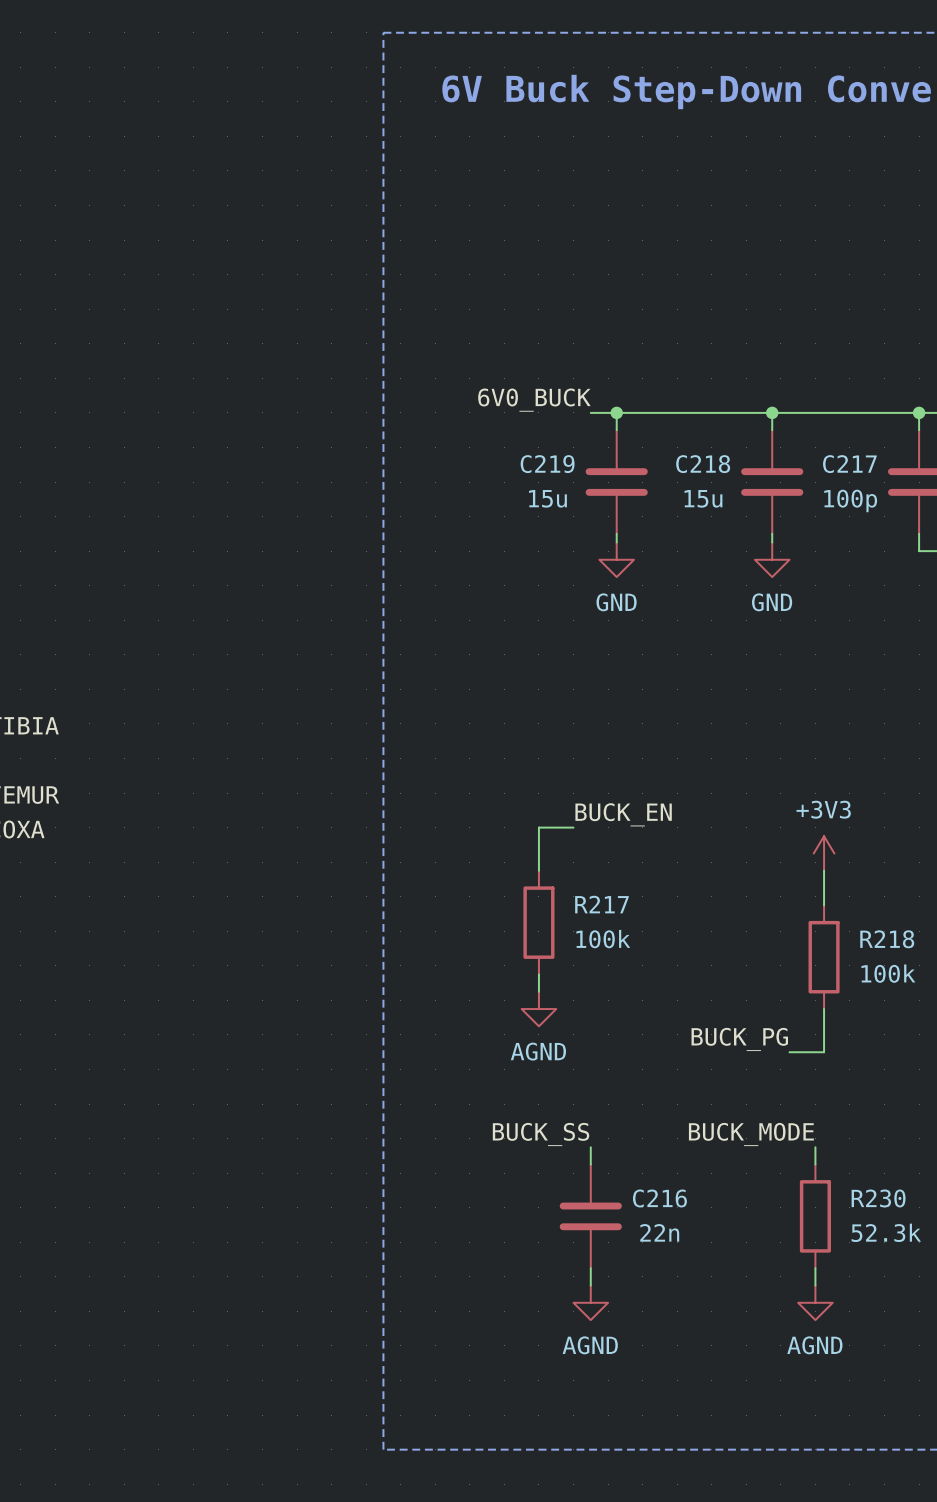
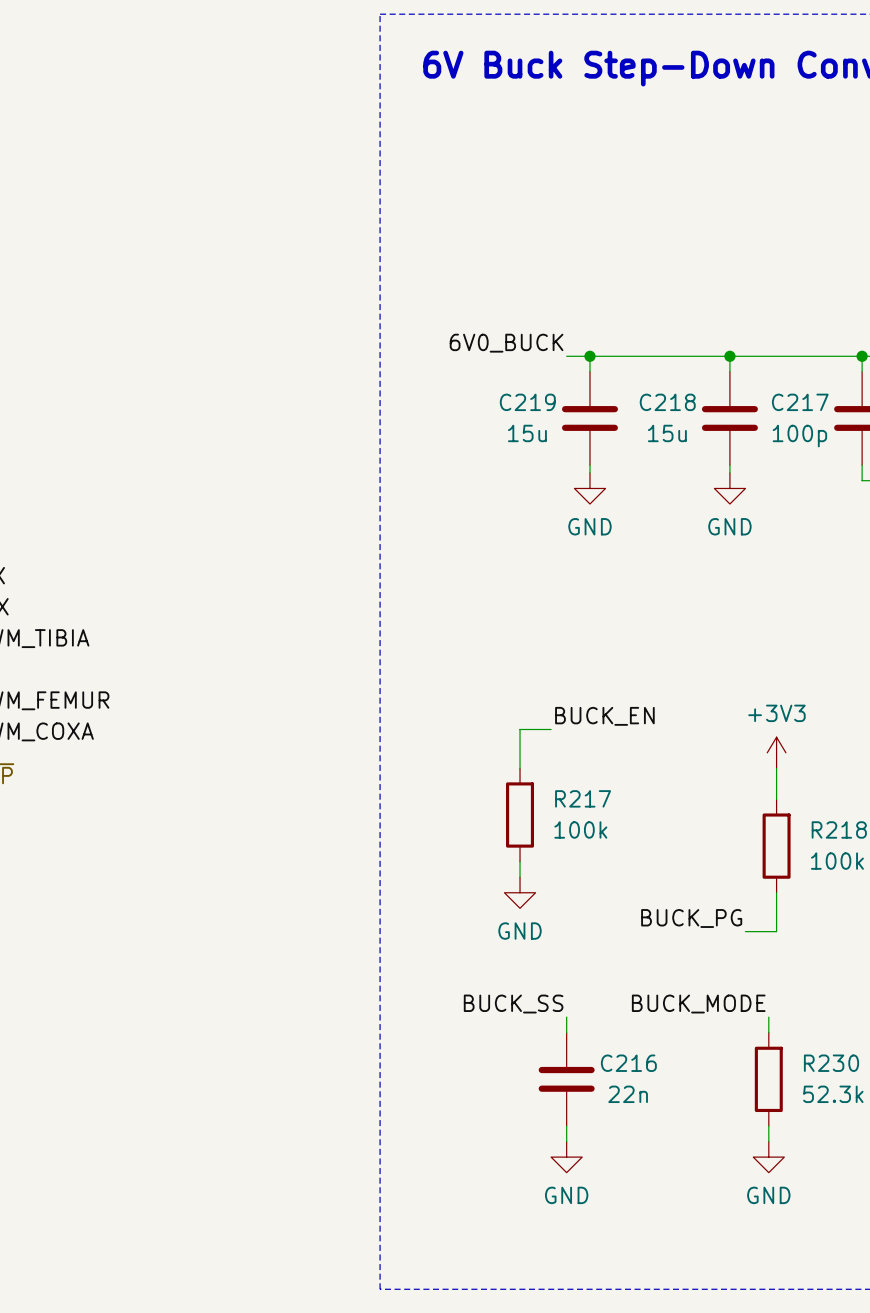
power symbol: AGND (538, 1009) -> GND (520, 892)
power symbol: AGND (590, 1302) -> GND (566, 1157)
power symbol: AGND (815, 1302) -> GND (768, 1157)

